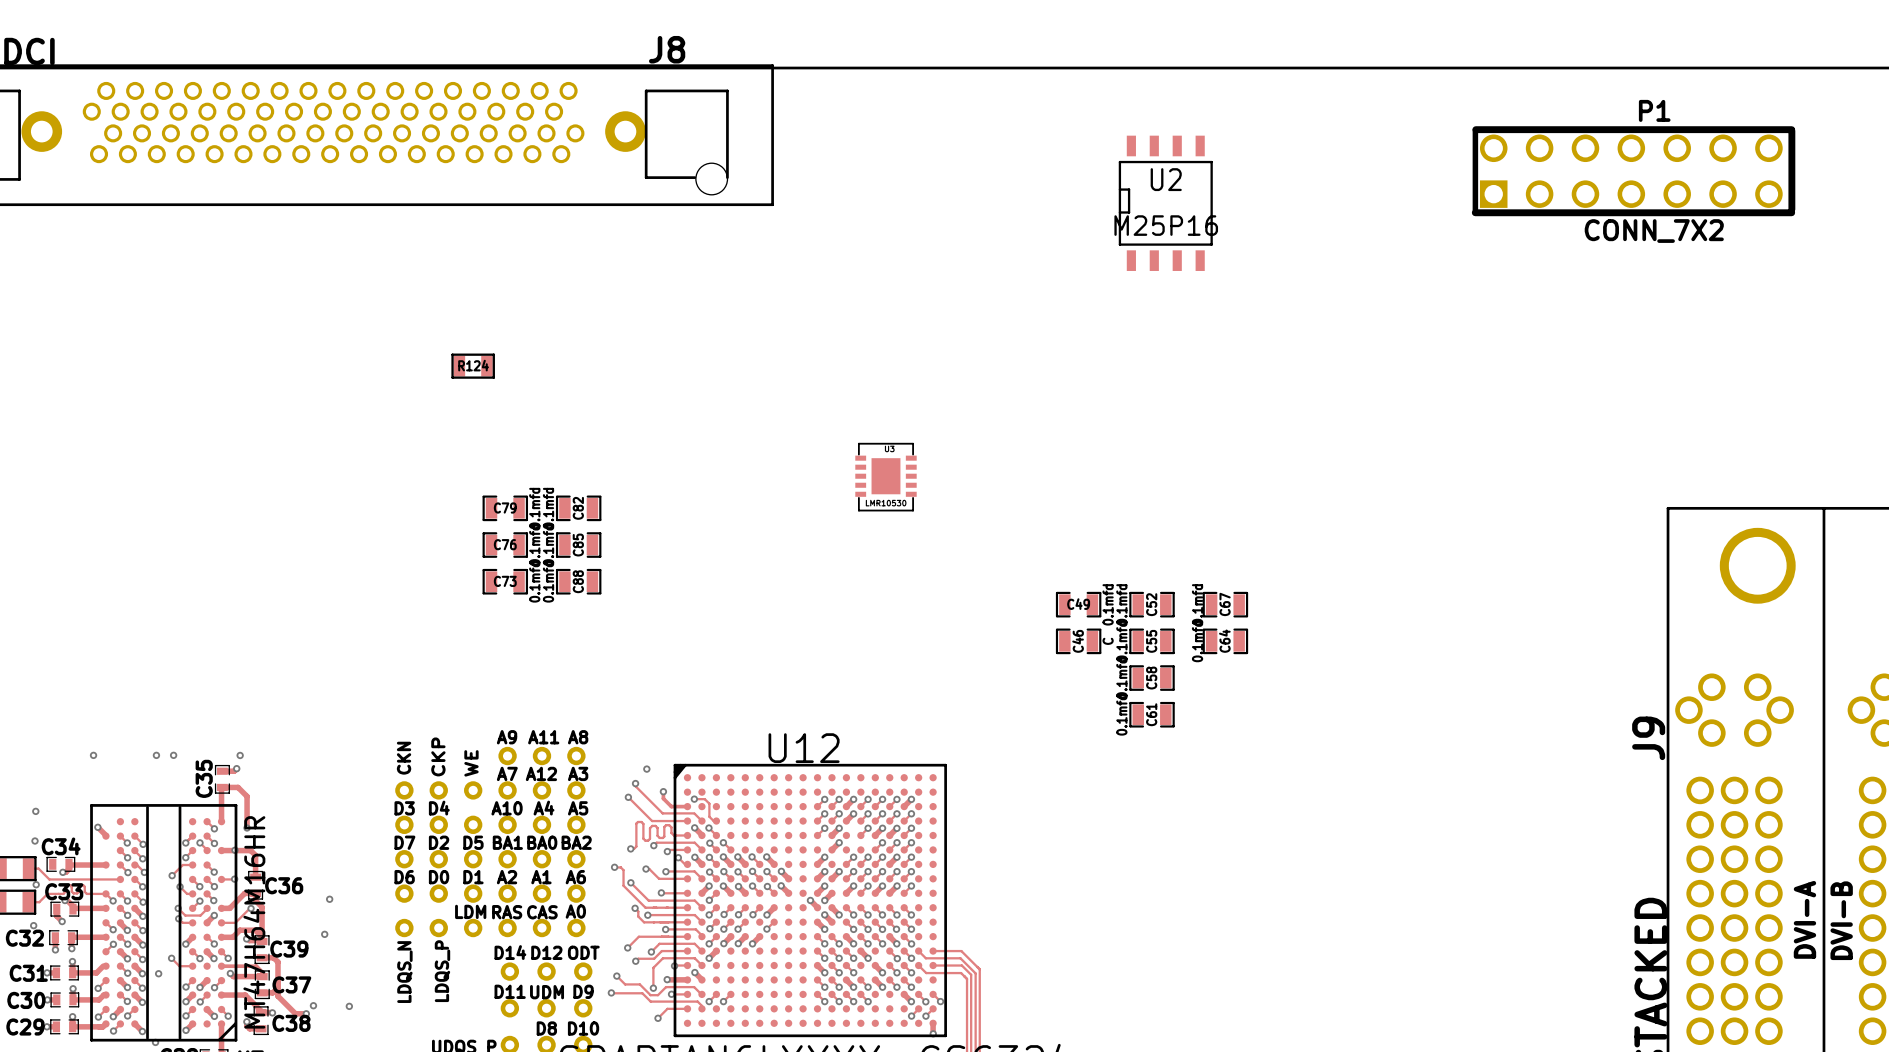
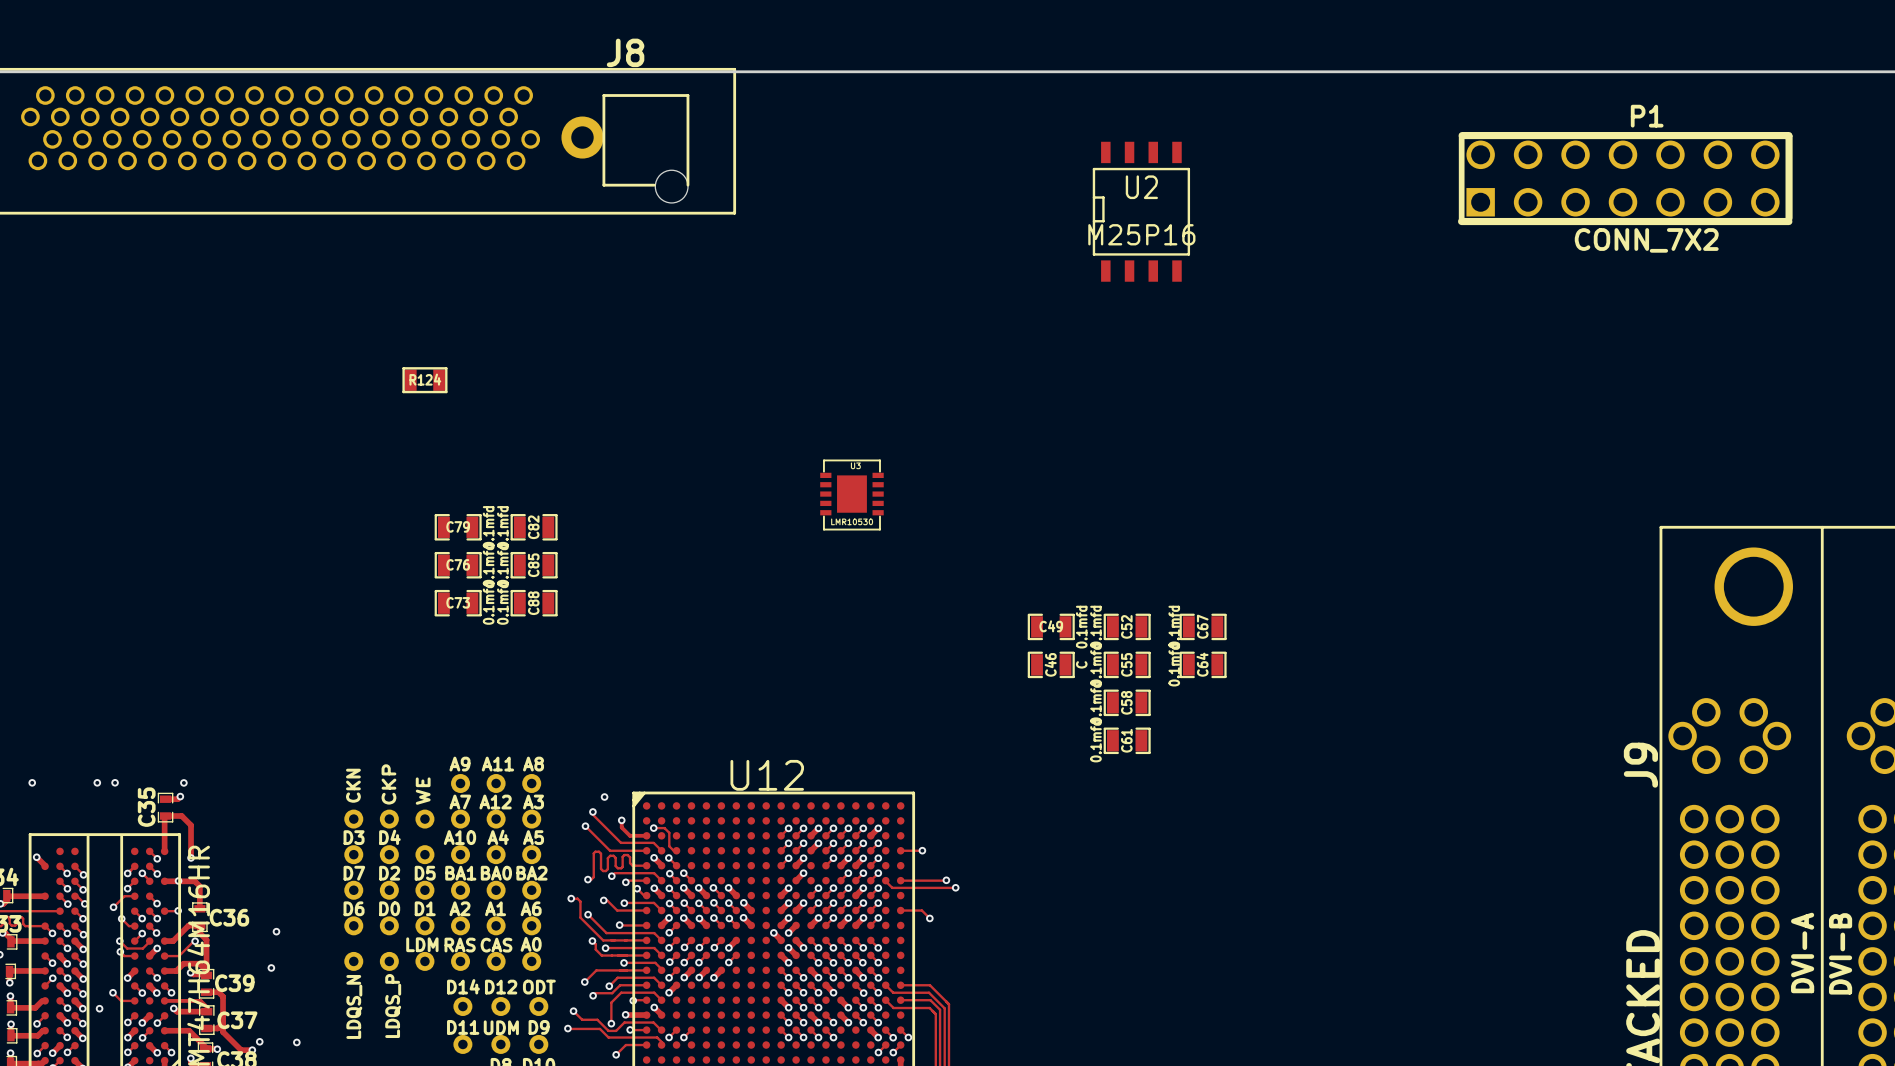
via: none -> (922, 850)
track: none -> (900, 850) (922, 850)
track: none -> (885, 880) (892, 887) (955, 887)
track: none -> (946, 880) (900, 880)
via: none -> (946, 880)
via: none -> (955, 887)
track: none -> (900, 910) (921, 910) (929, 918)
via: none -> (929, 918)

